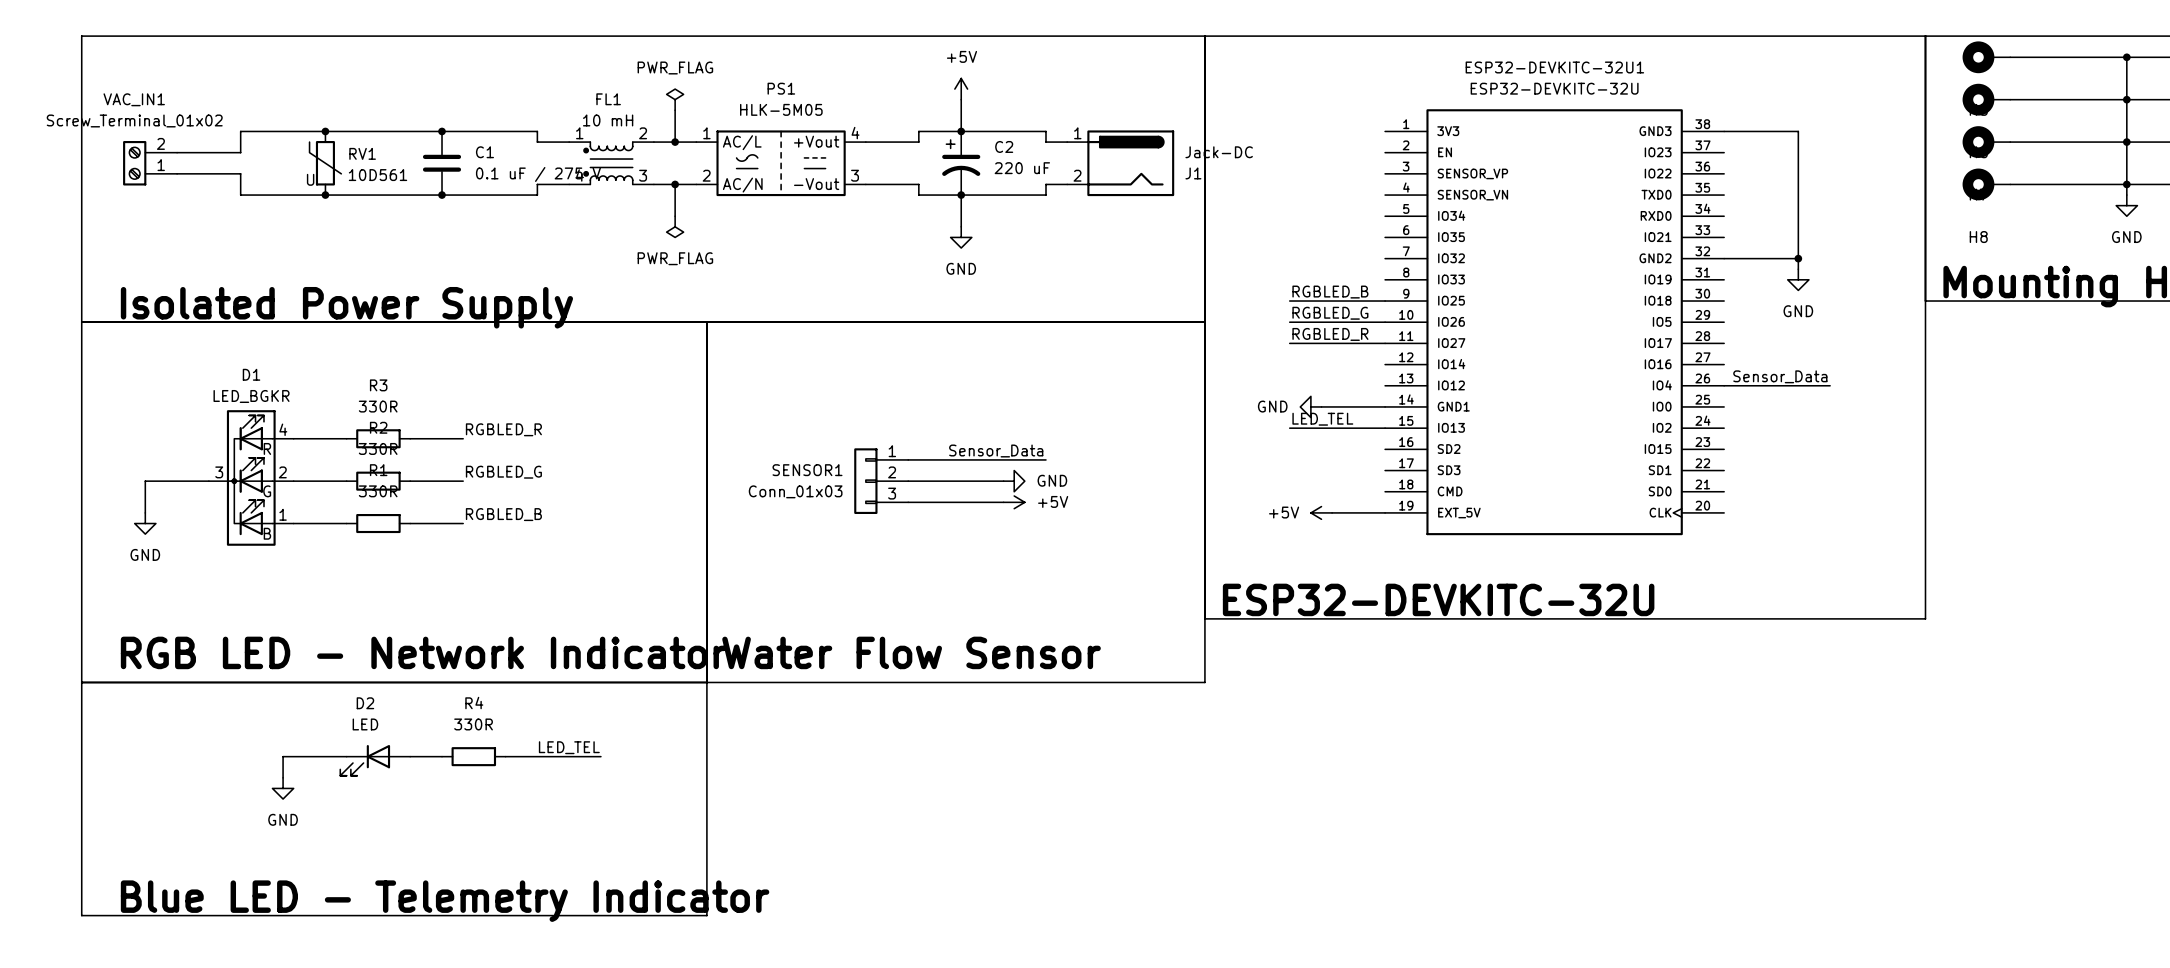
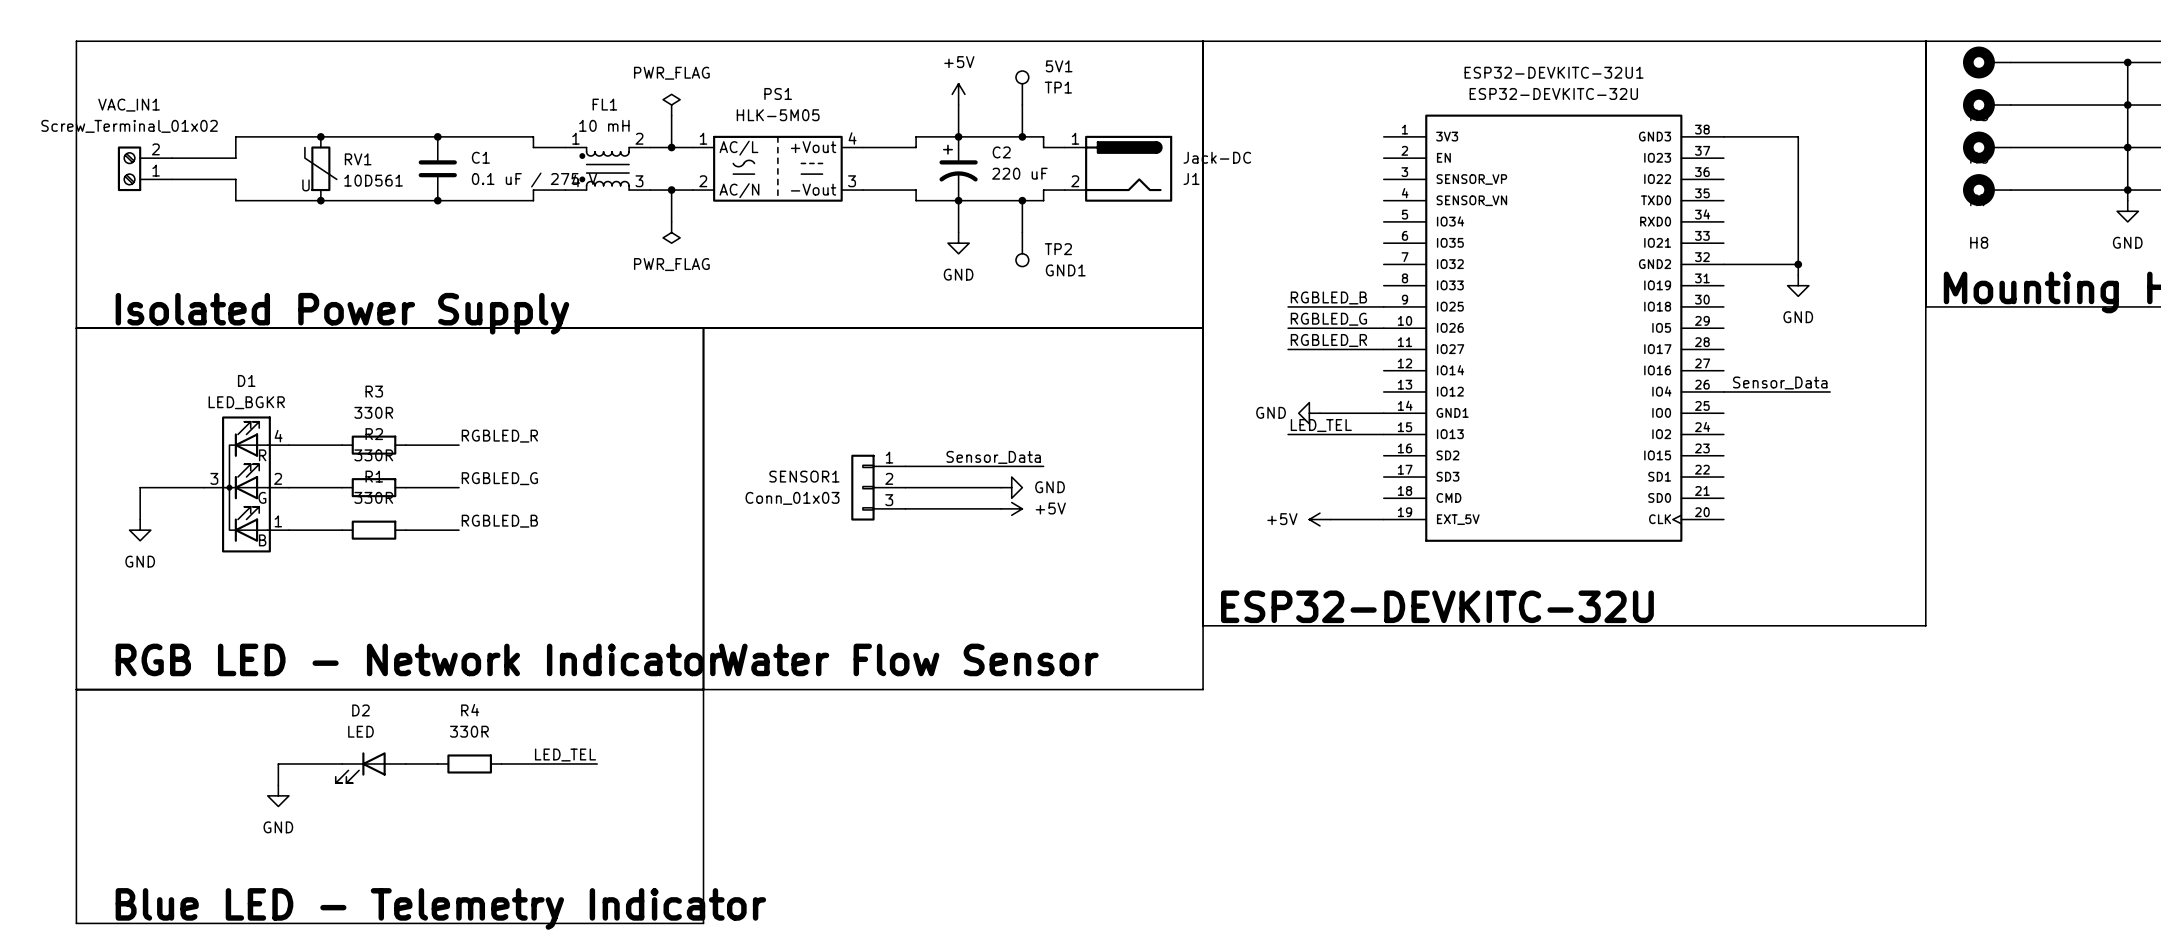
5V1: none -> TP1 (1022, 88)
wire: none -> (1022, 105) (1022, 136)
junction: none -> (1022, 136)
wire: none -> (1022, 200) (1022, 232)
junction: none -> (1022, 200)
GND1: none -> TP2 (1022, 249)

